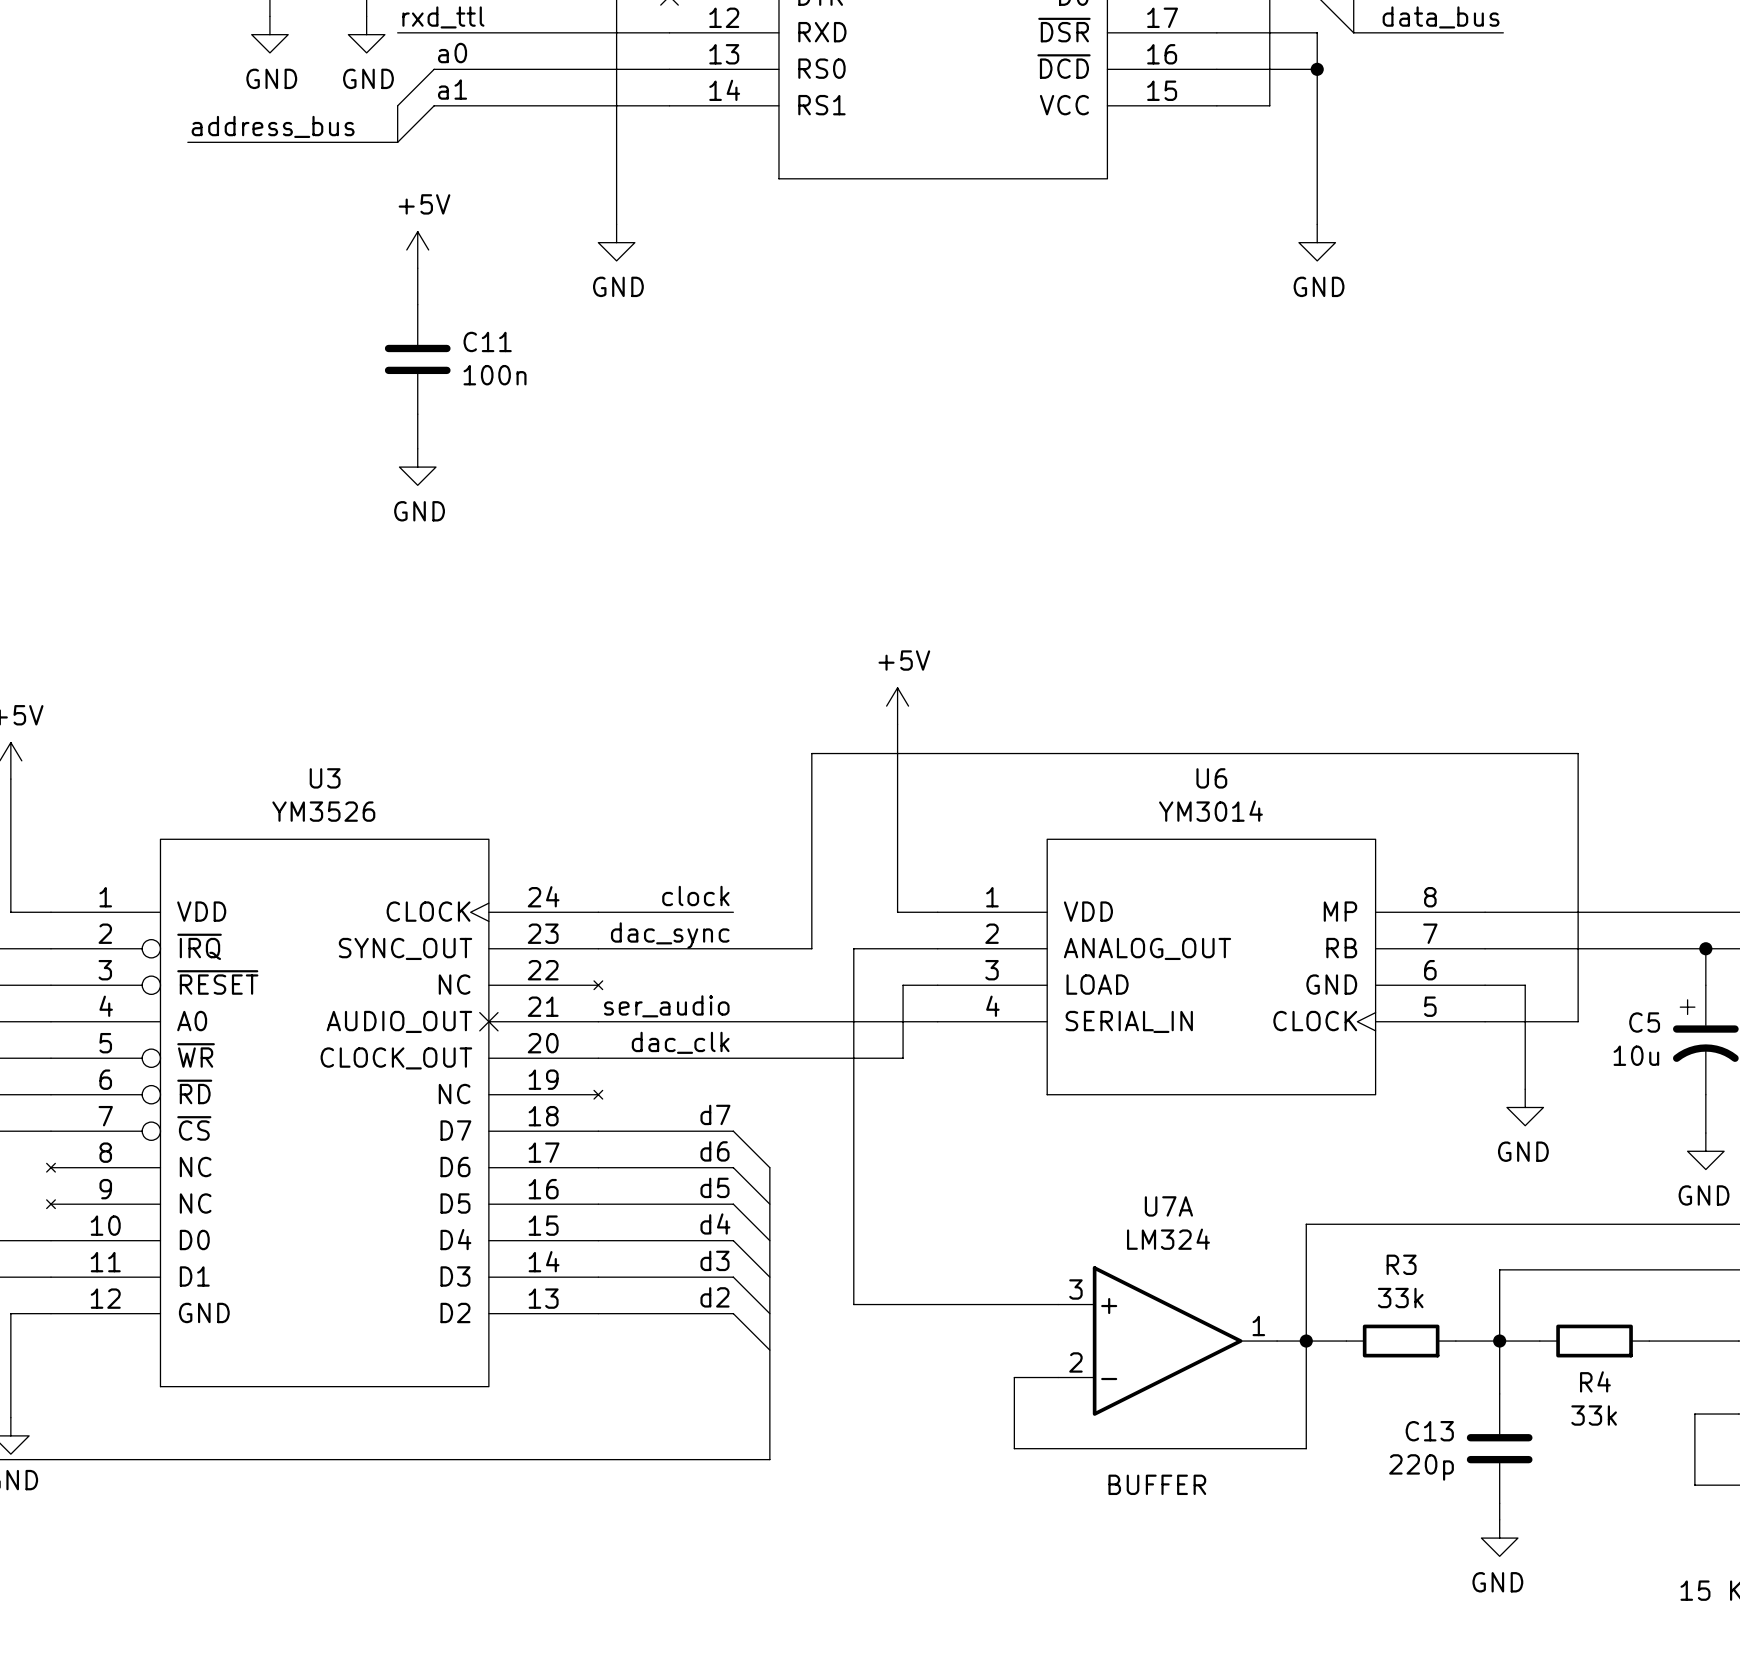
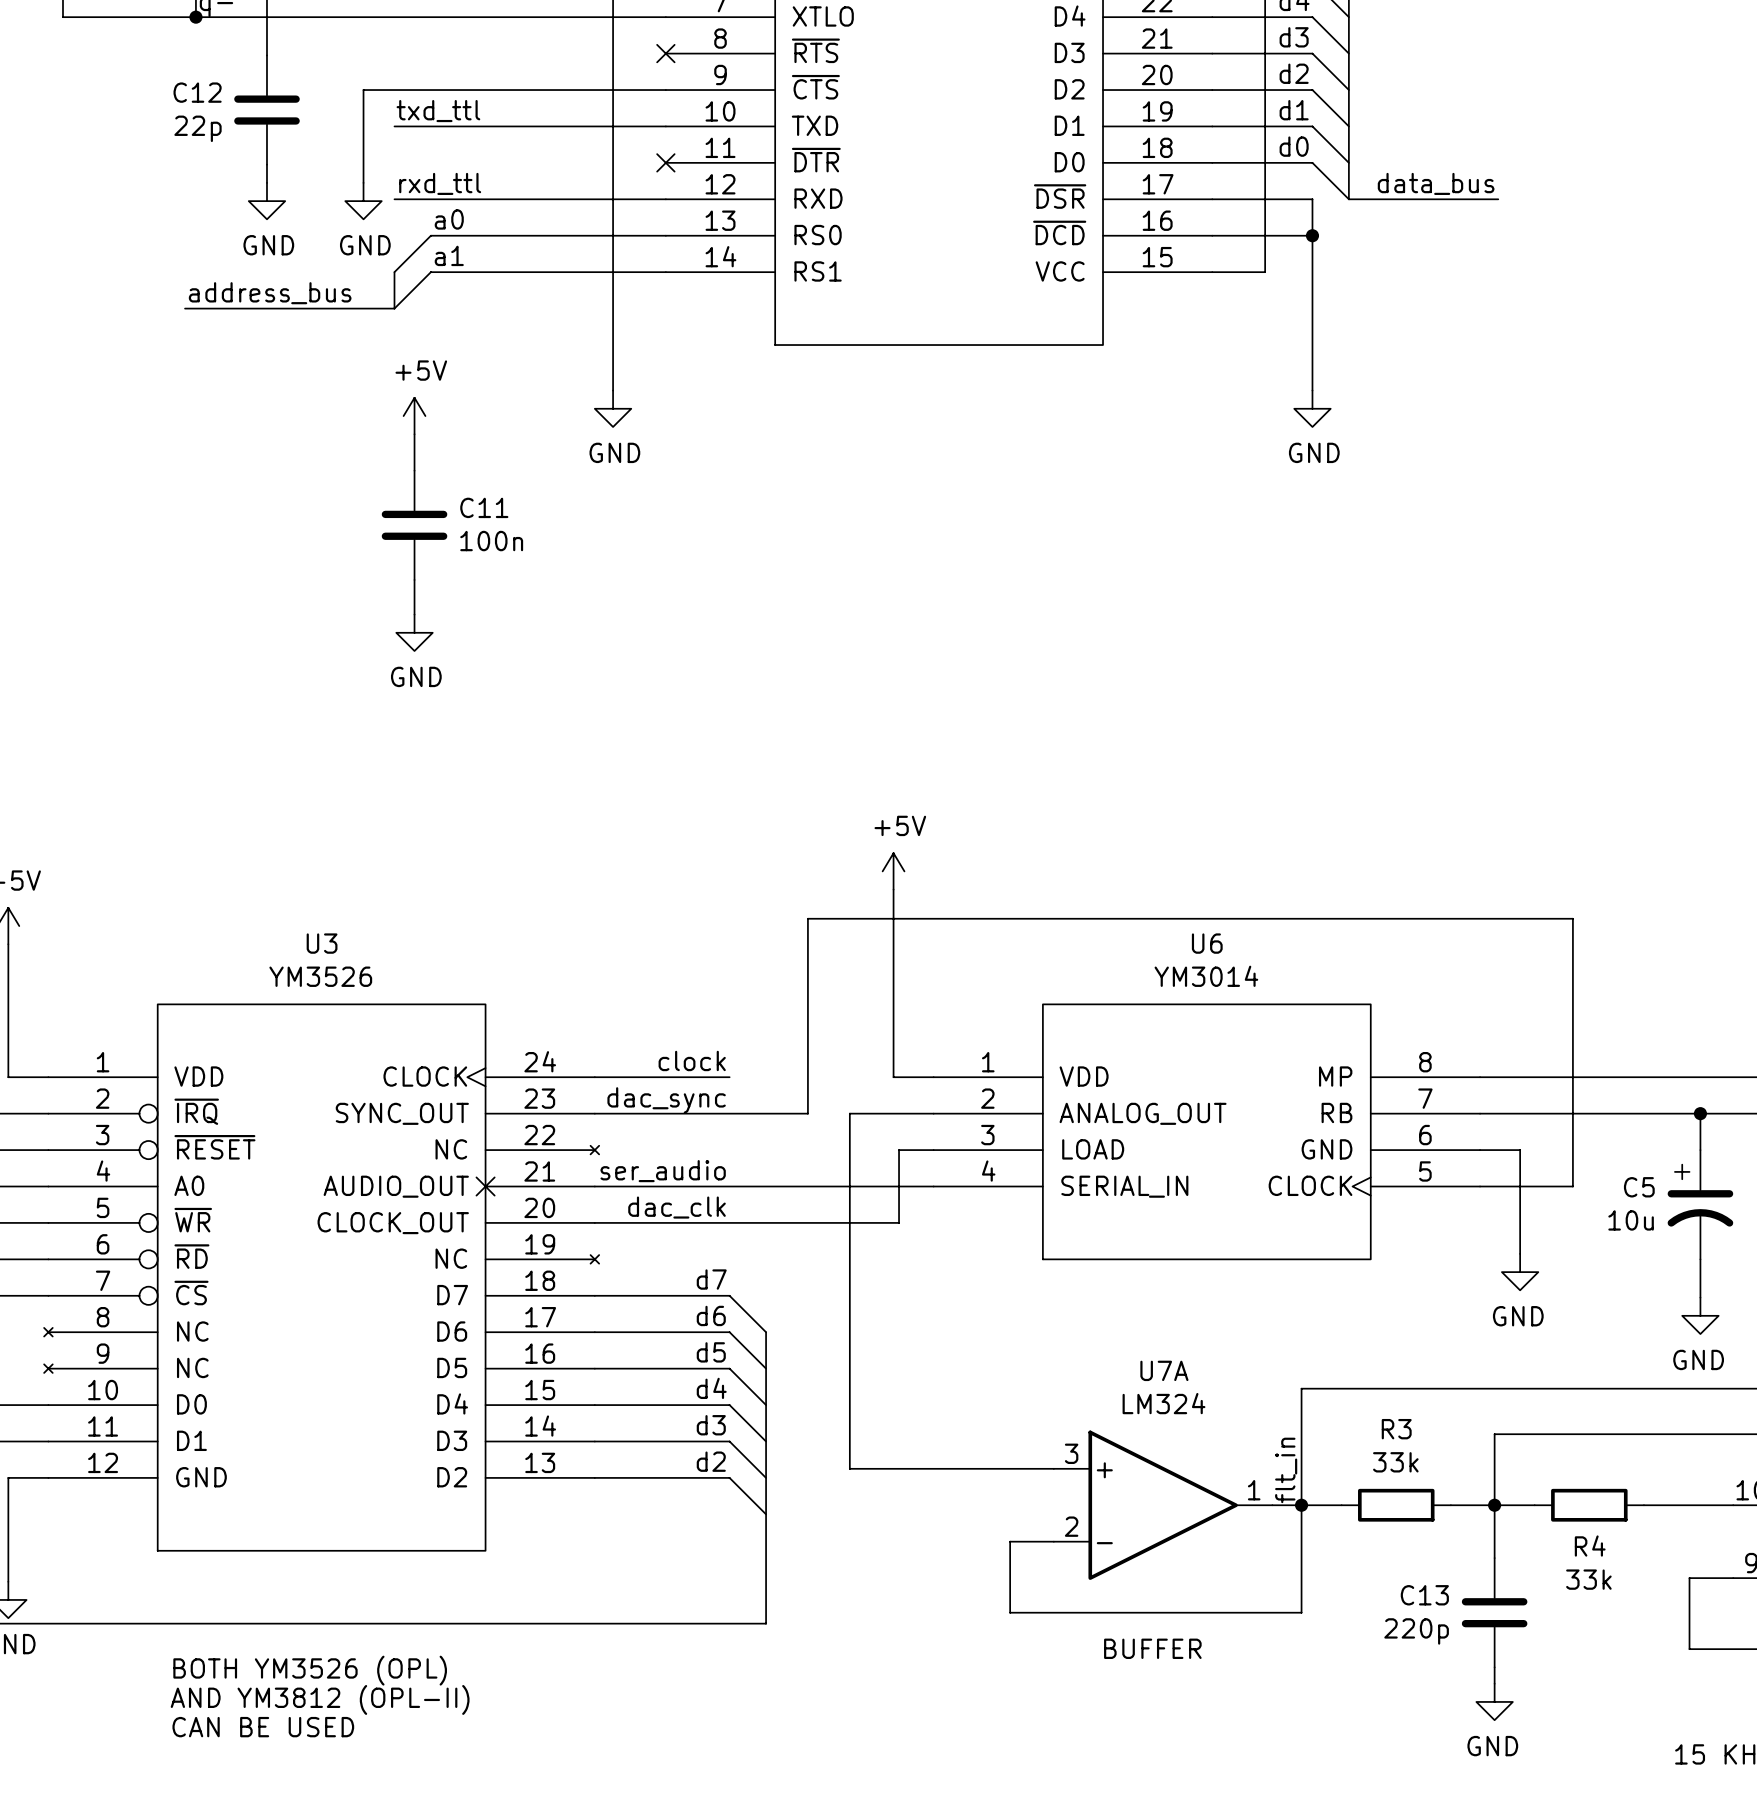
label: none -> flt_in (1286, 1470)
text: none -> BOTH YM3526 (OPL) (310, 1670)
text: none -> AND YM3812 (OPL-II) (320, 1699)
text: none -> CAN BE USED (263, 1727)

